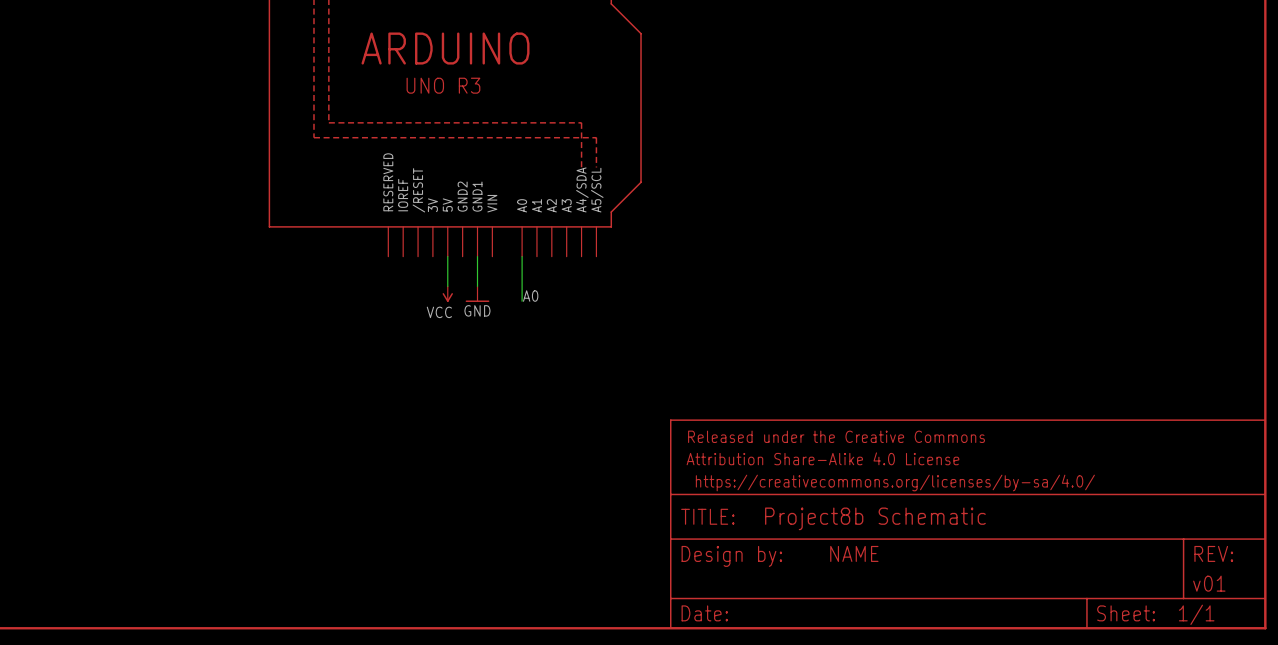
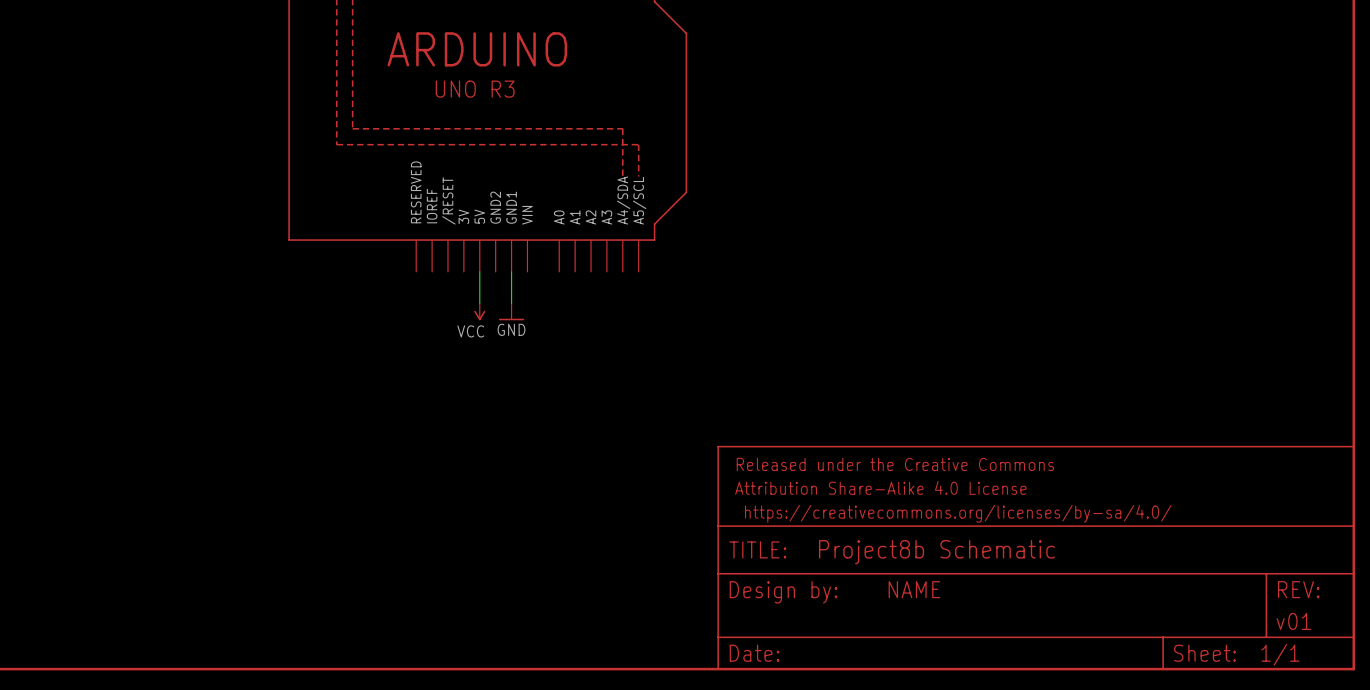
wire: (522, 256) (522, 301) -> none
label: A0 (530, 296) -> none

